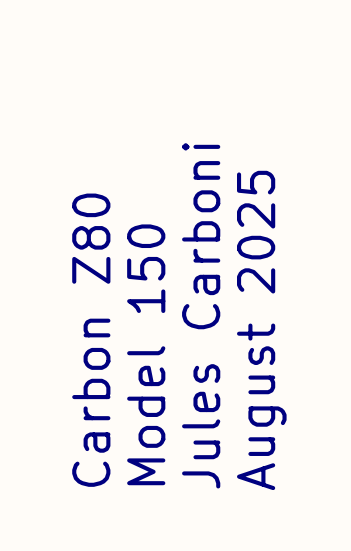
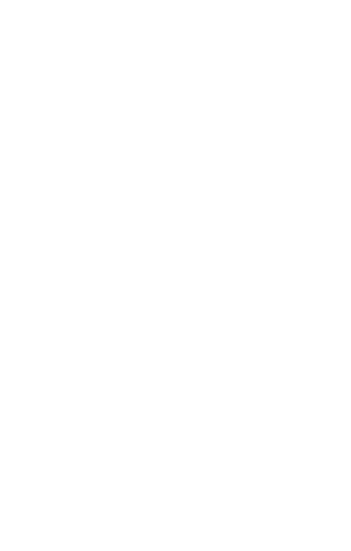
text: Jules Carboni (201, 315) -> none
text: August 2025 (261, 330) -> none
text: Carbon Z80 (91, 340) -> none
text: Model 150 (146, 354) -> none

